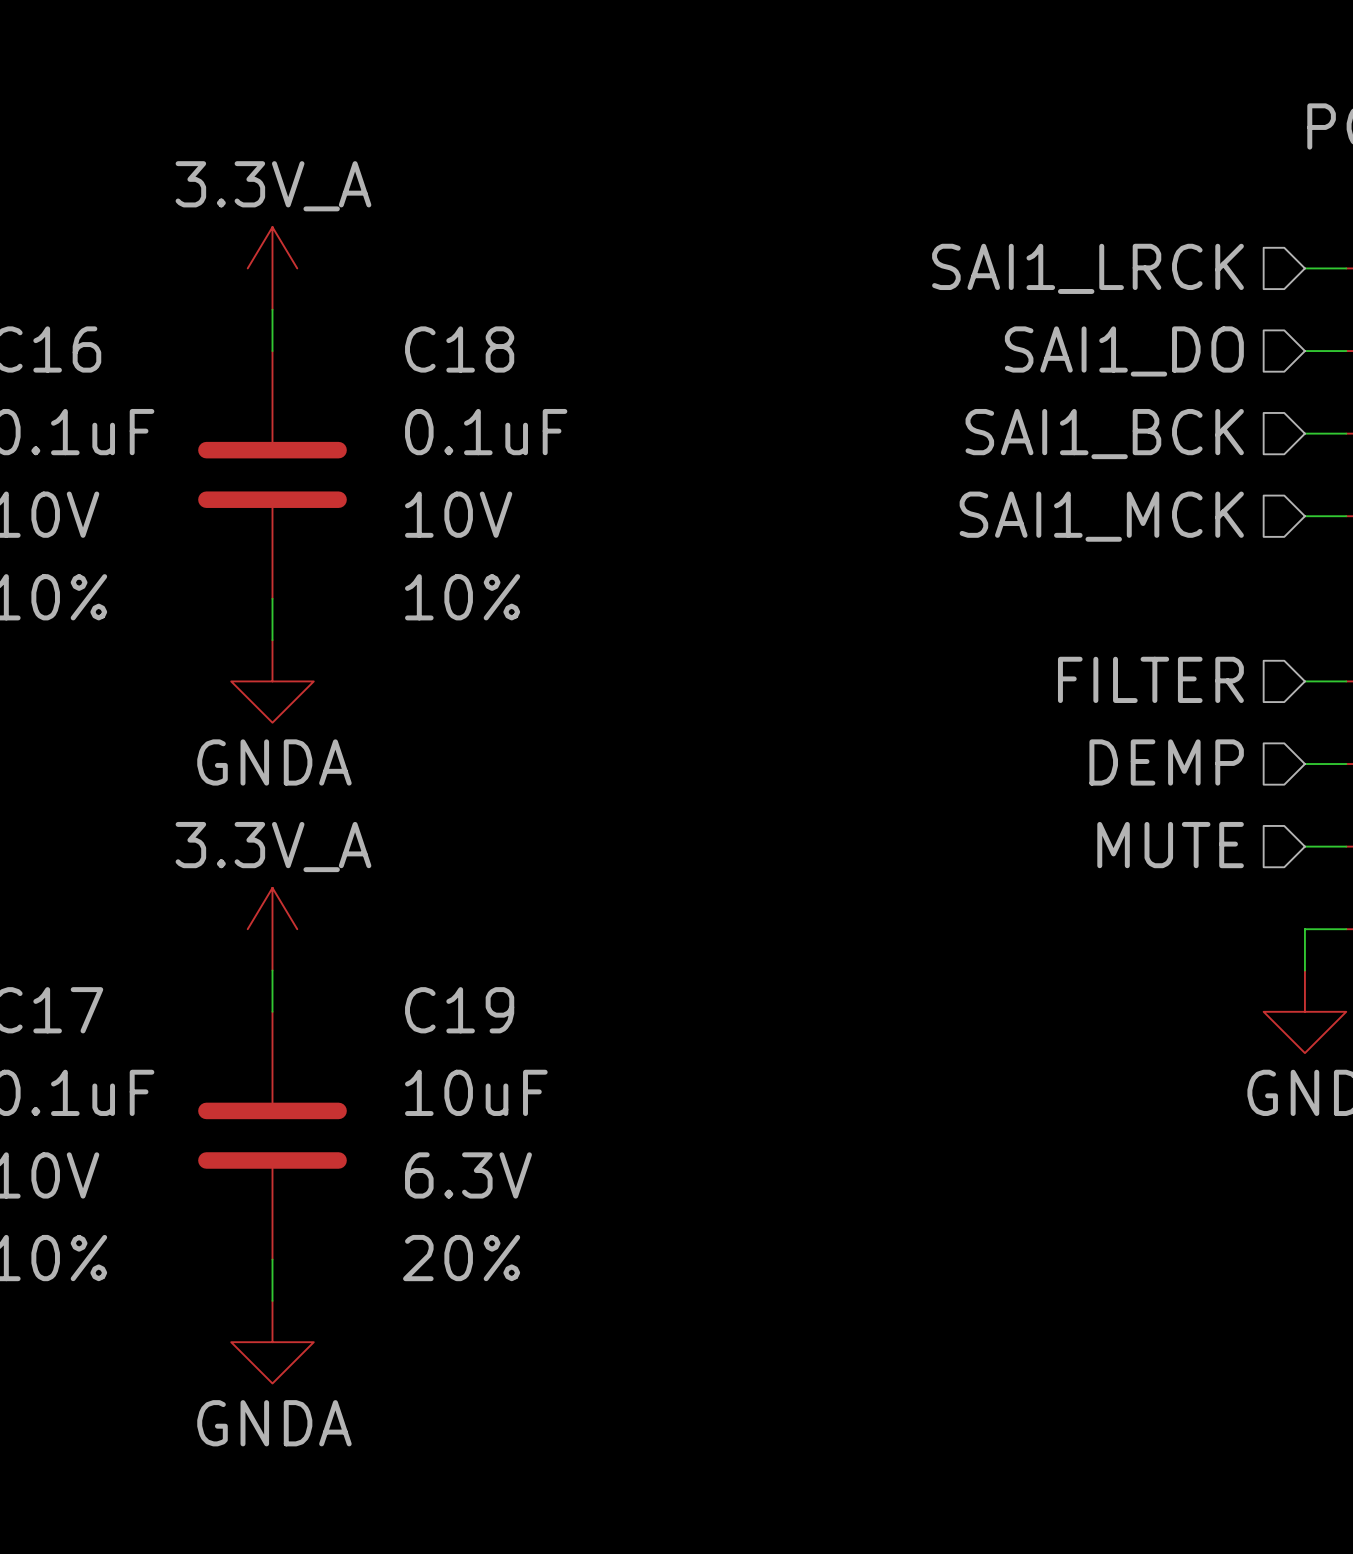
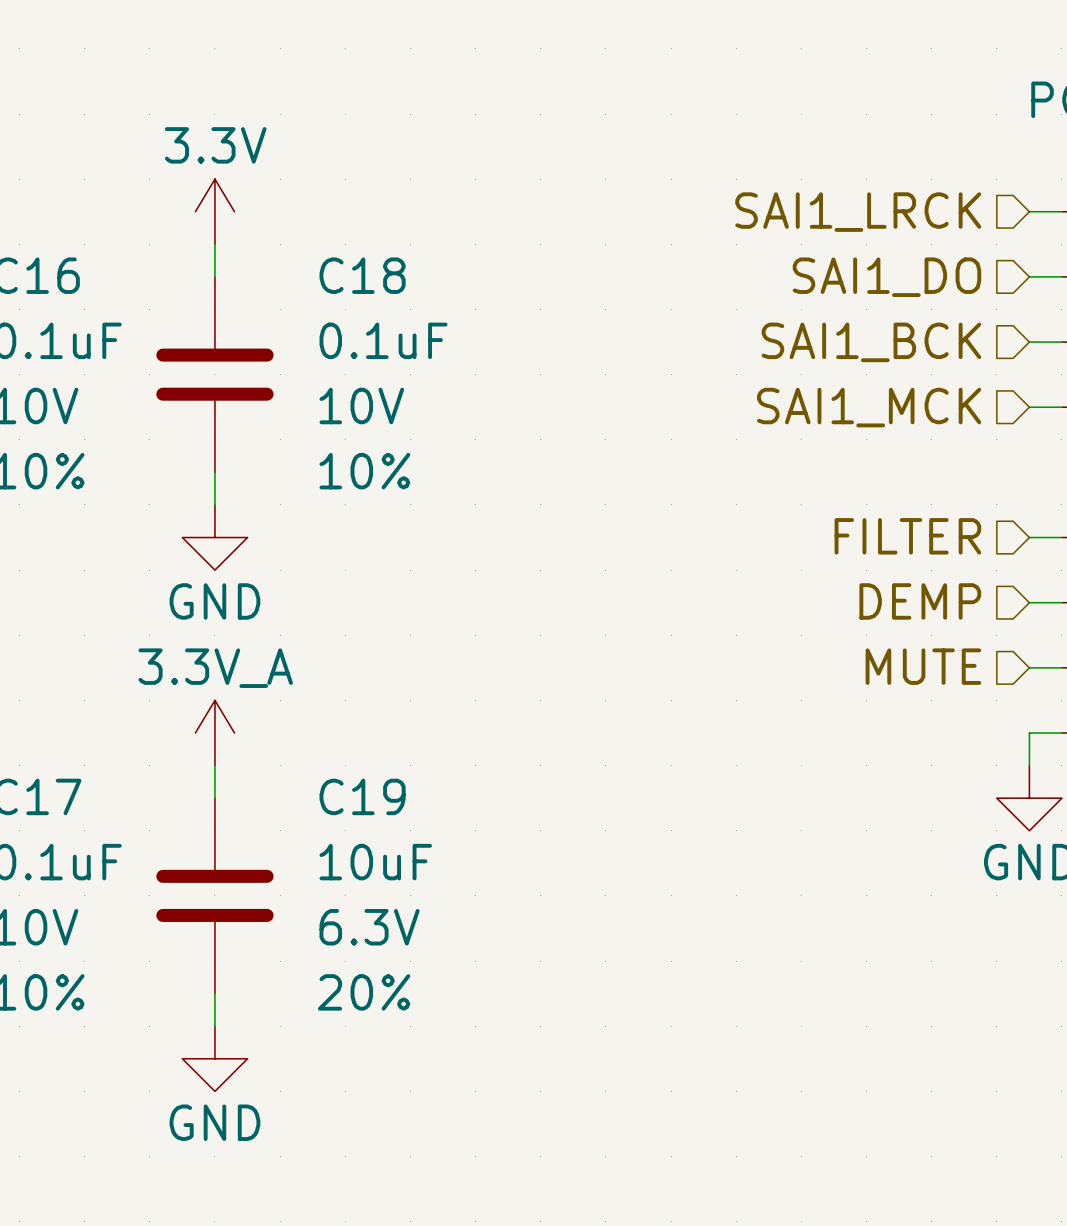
power symbol: 3.3V_A (272, 268) -> 3.3V (214, 211)
power symbol: GNDA (272, 681) -> GND (214, 537)
power symbol: GNDA (272, 1342) -> GND (214, 1058)

